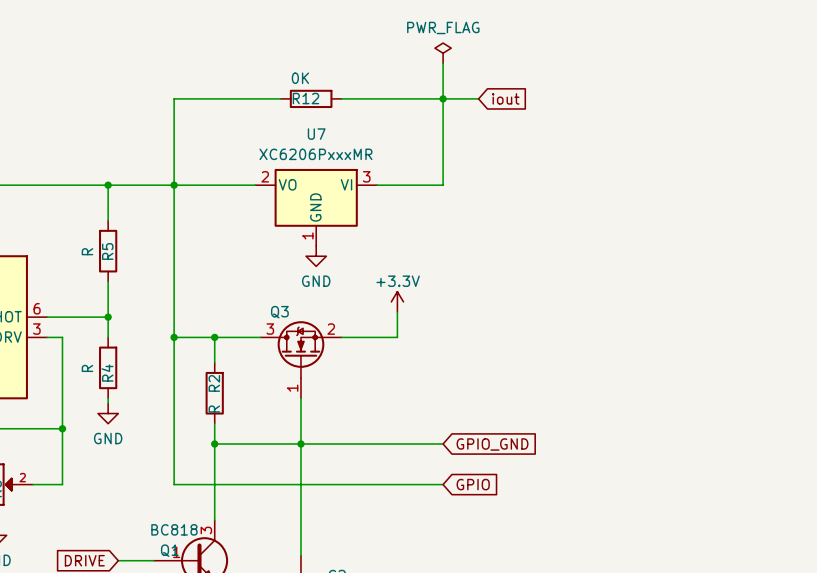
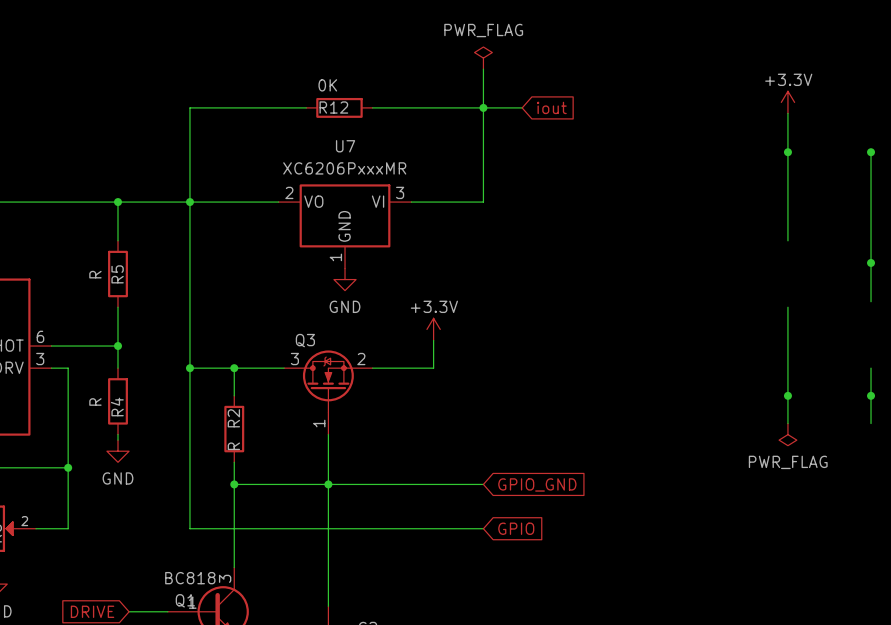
power symbol: none -> +3.3V (787, 102)
wire: none -> (787, 113) (787, 240)
junction: none -> (787, 152)
wire: none -> (871, 152) (871, 301)
junction: none -> (871, 152)
junction: none -> (871, 262)
wire: none -> (787, 307) (787, 423)
wire: none -> (871, 368) (871, 423)
junction: none -> (787, 395)
junction: none -> (871, 395)
power symbol: none -> PWR_FLAG (787, 434)

